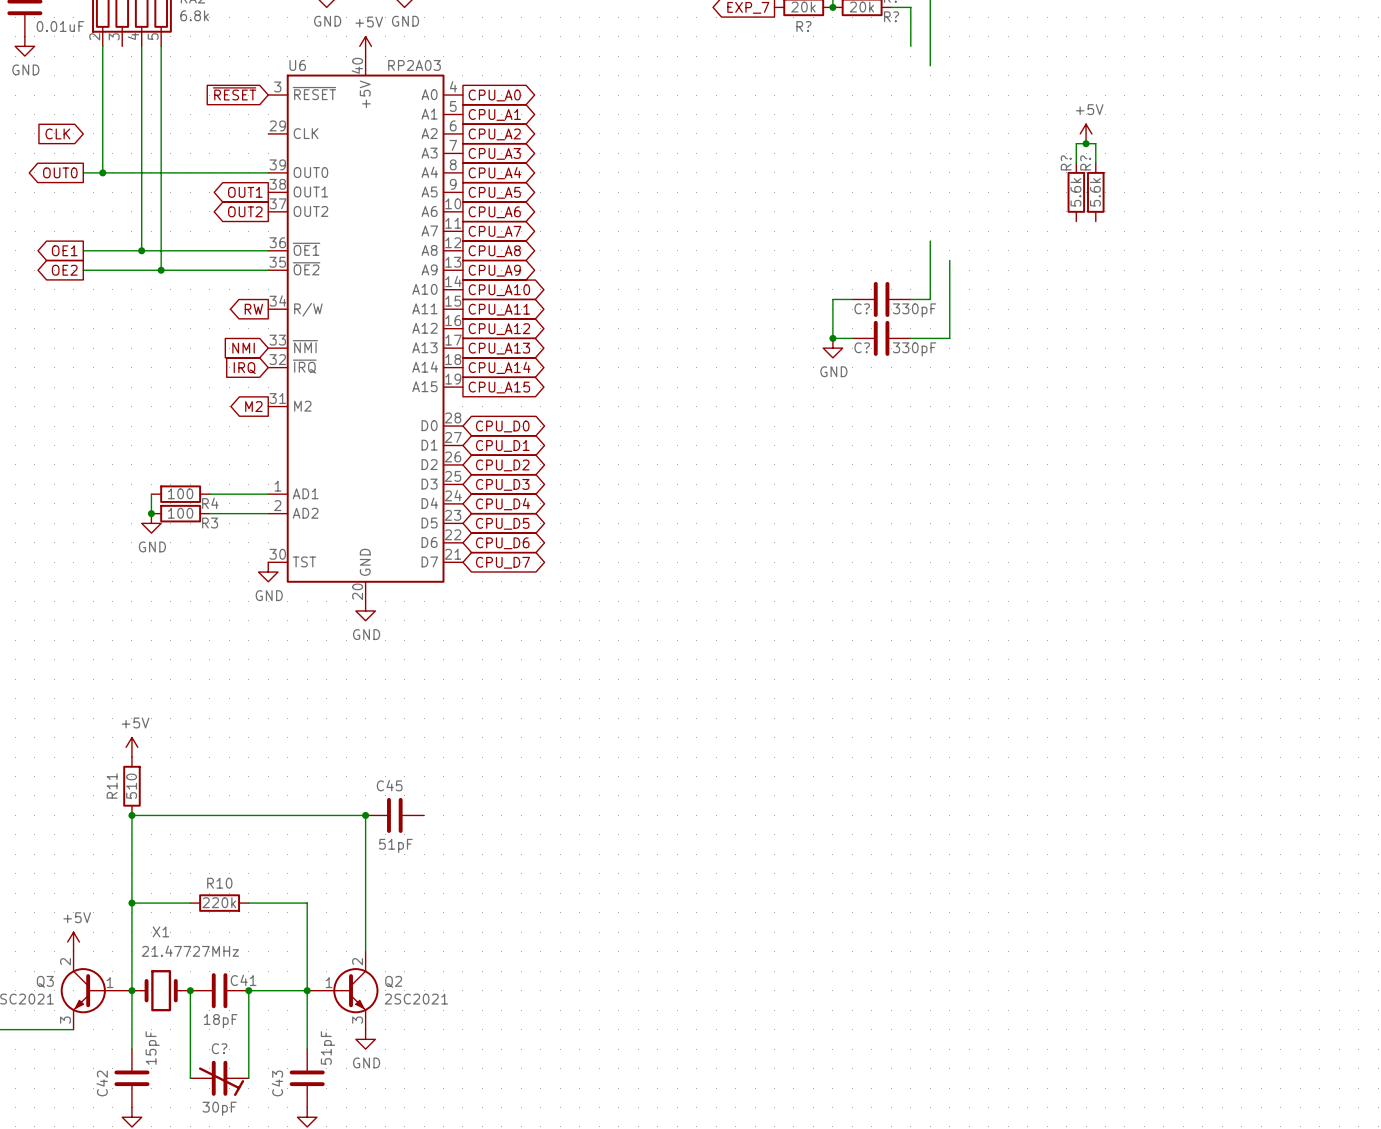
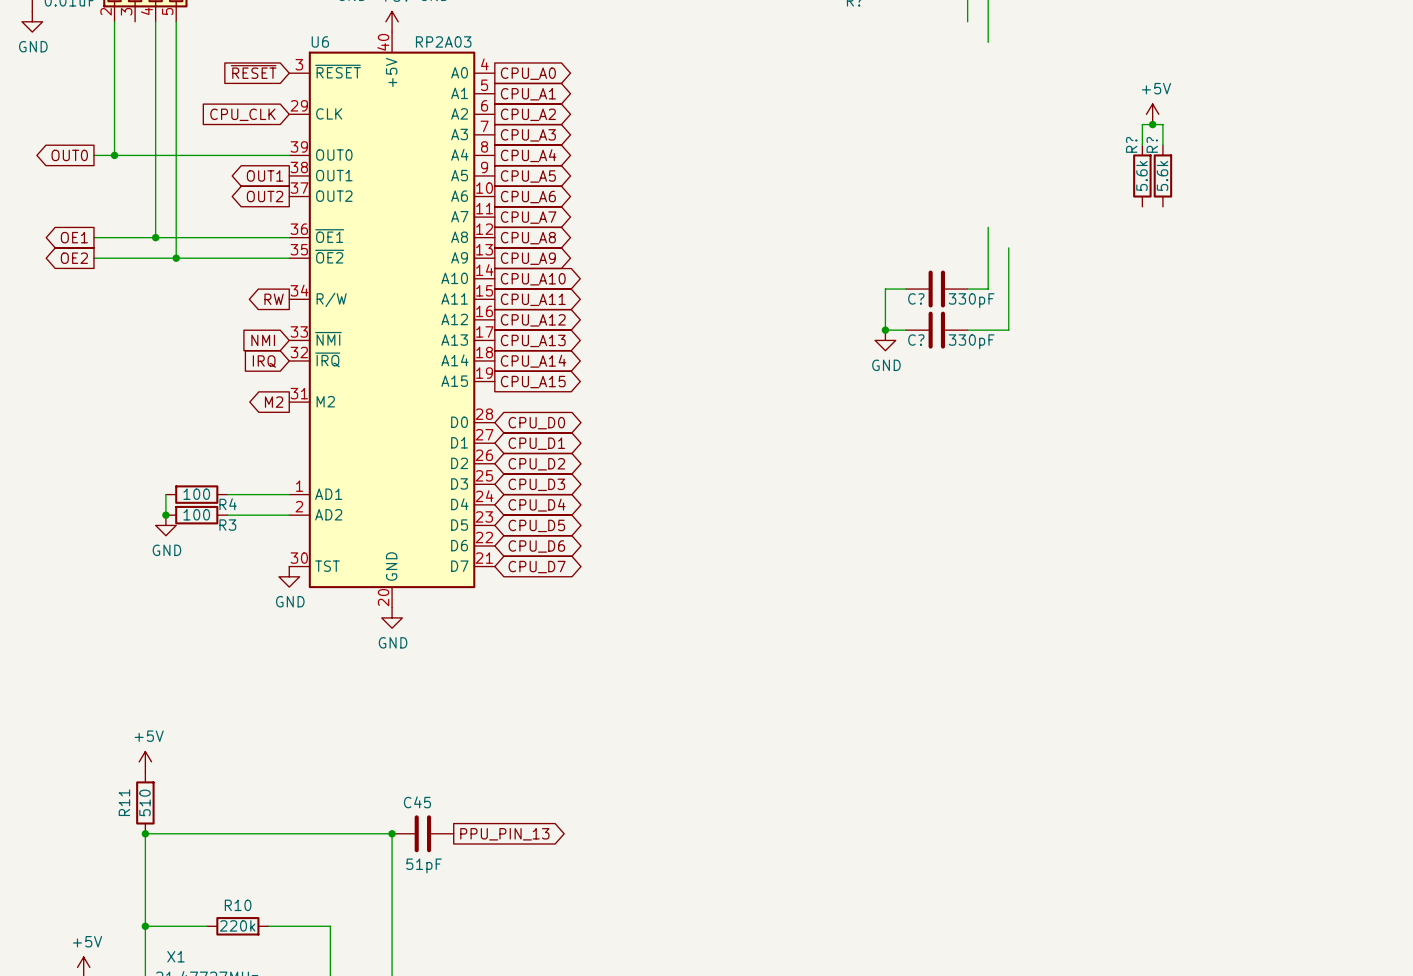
global label: CLK (57, 133) -> none
global label: none -> CPU_CLK (242, 114)
global label: none -> PPU_PIN_13 (504, 834)

